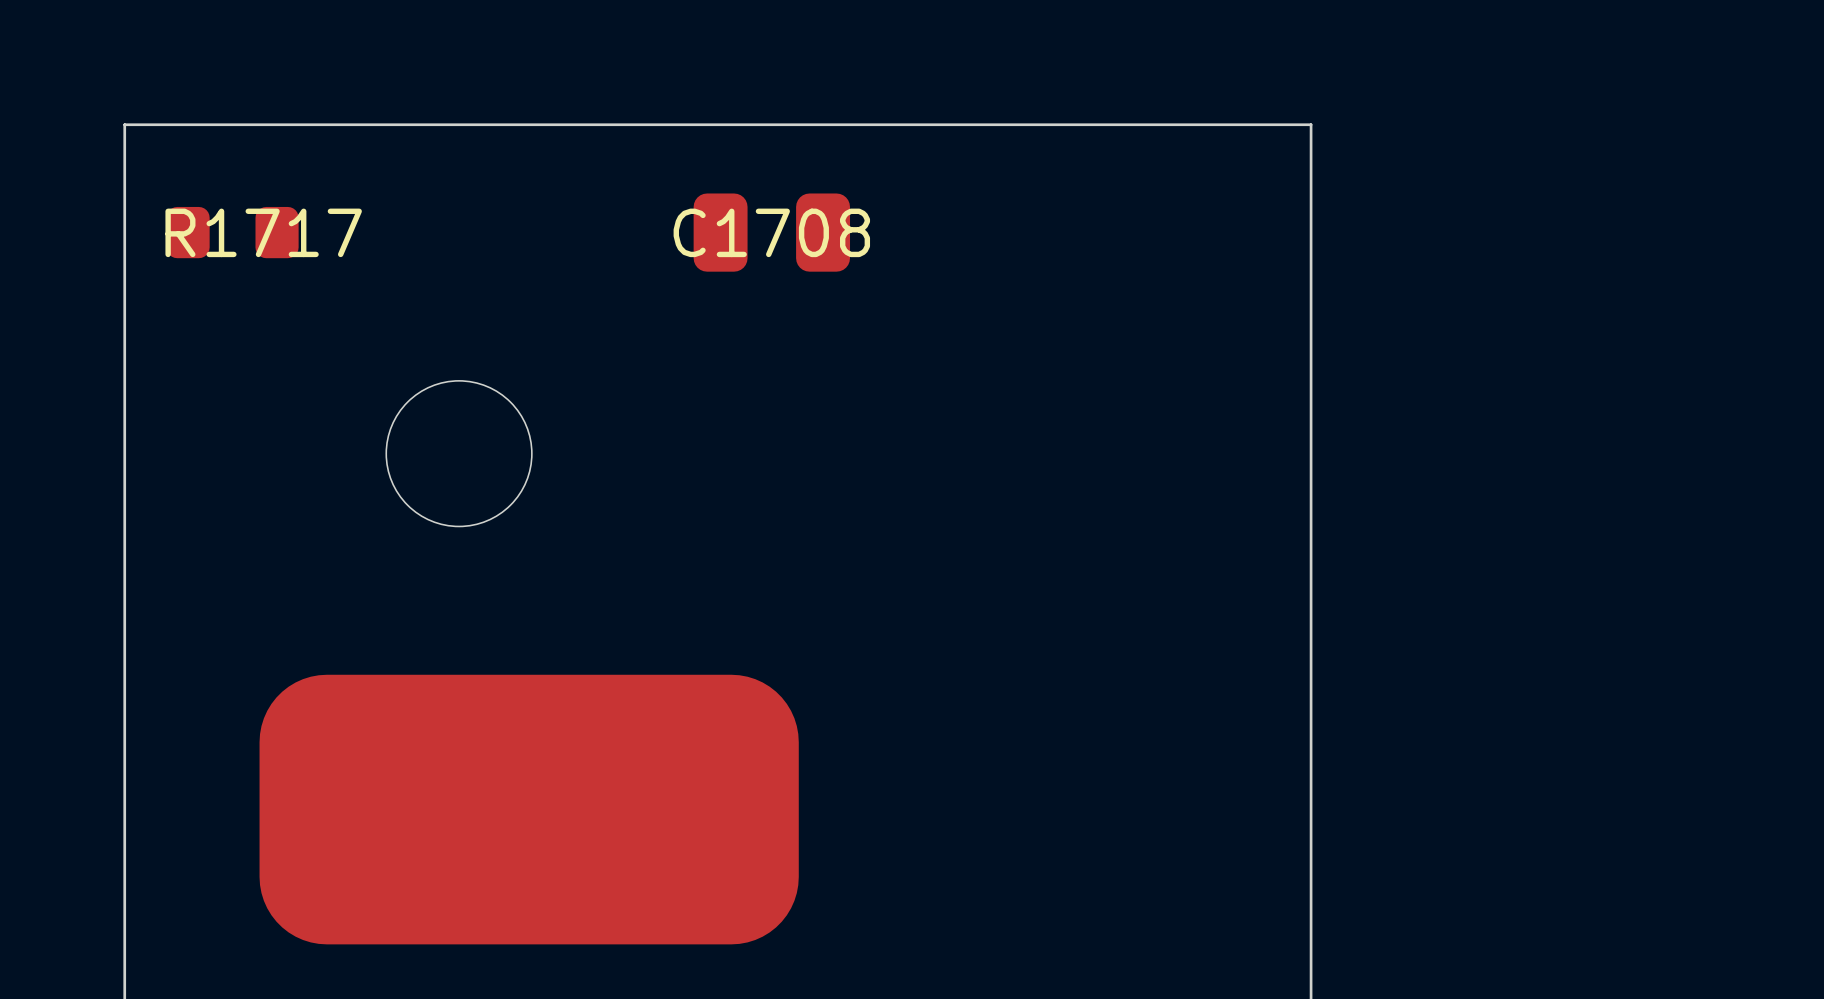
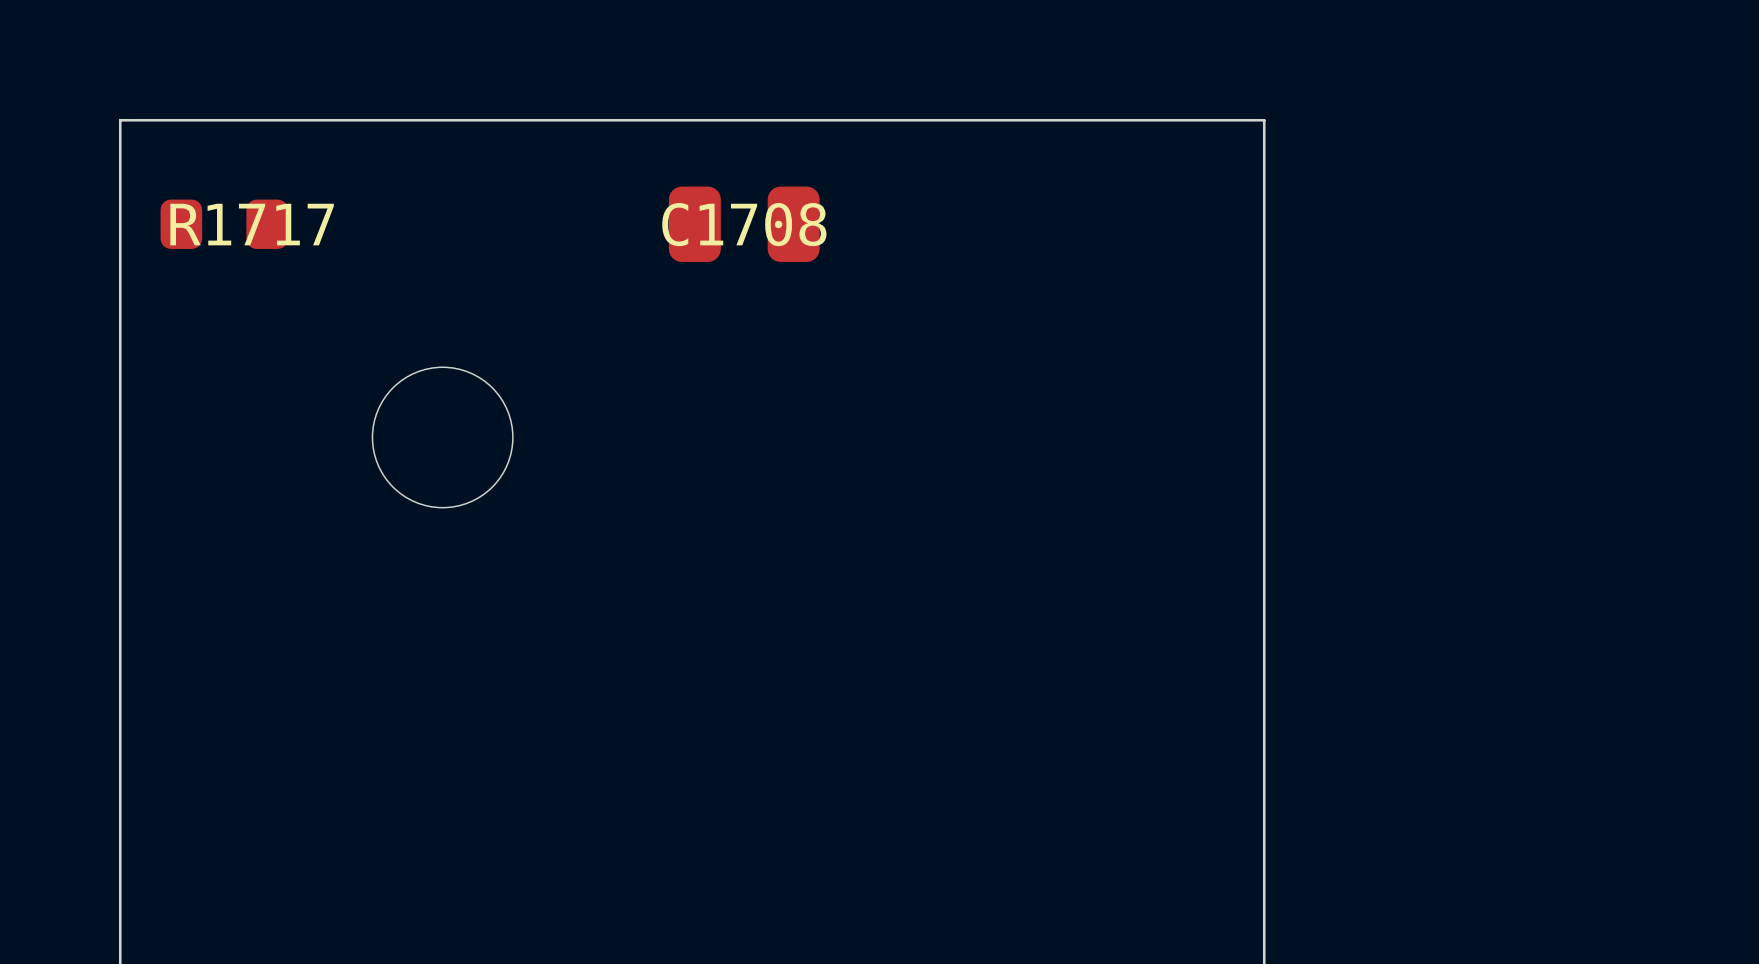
part: (529, 809) -> none

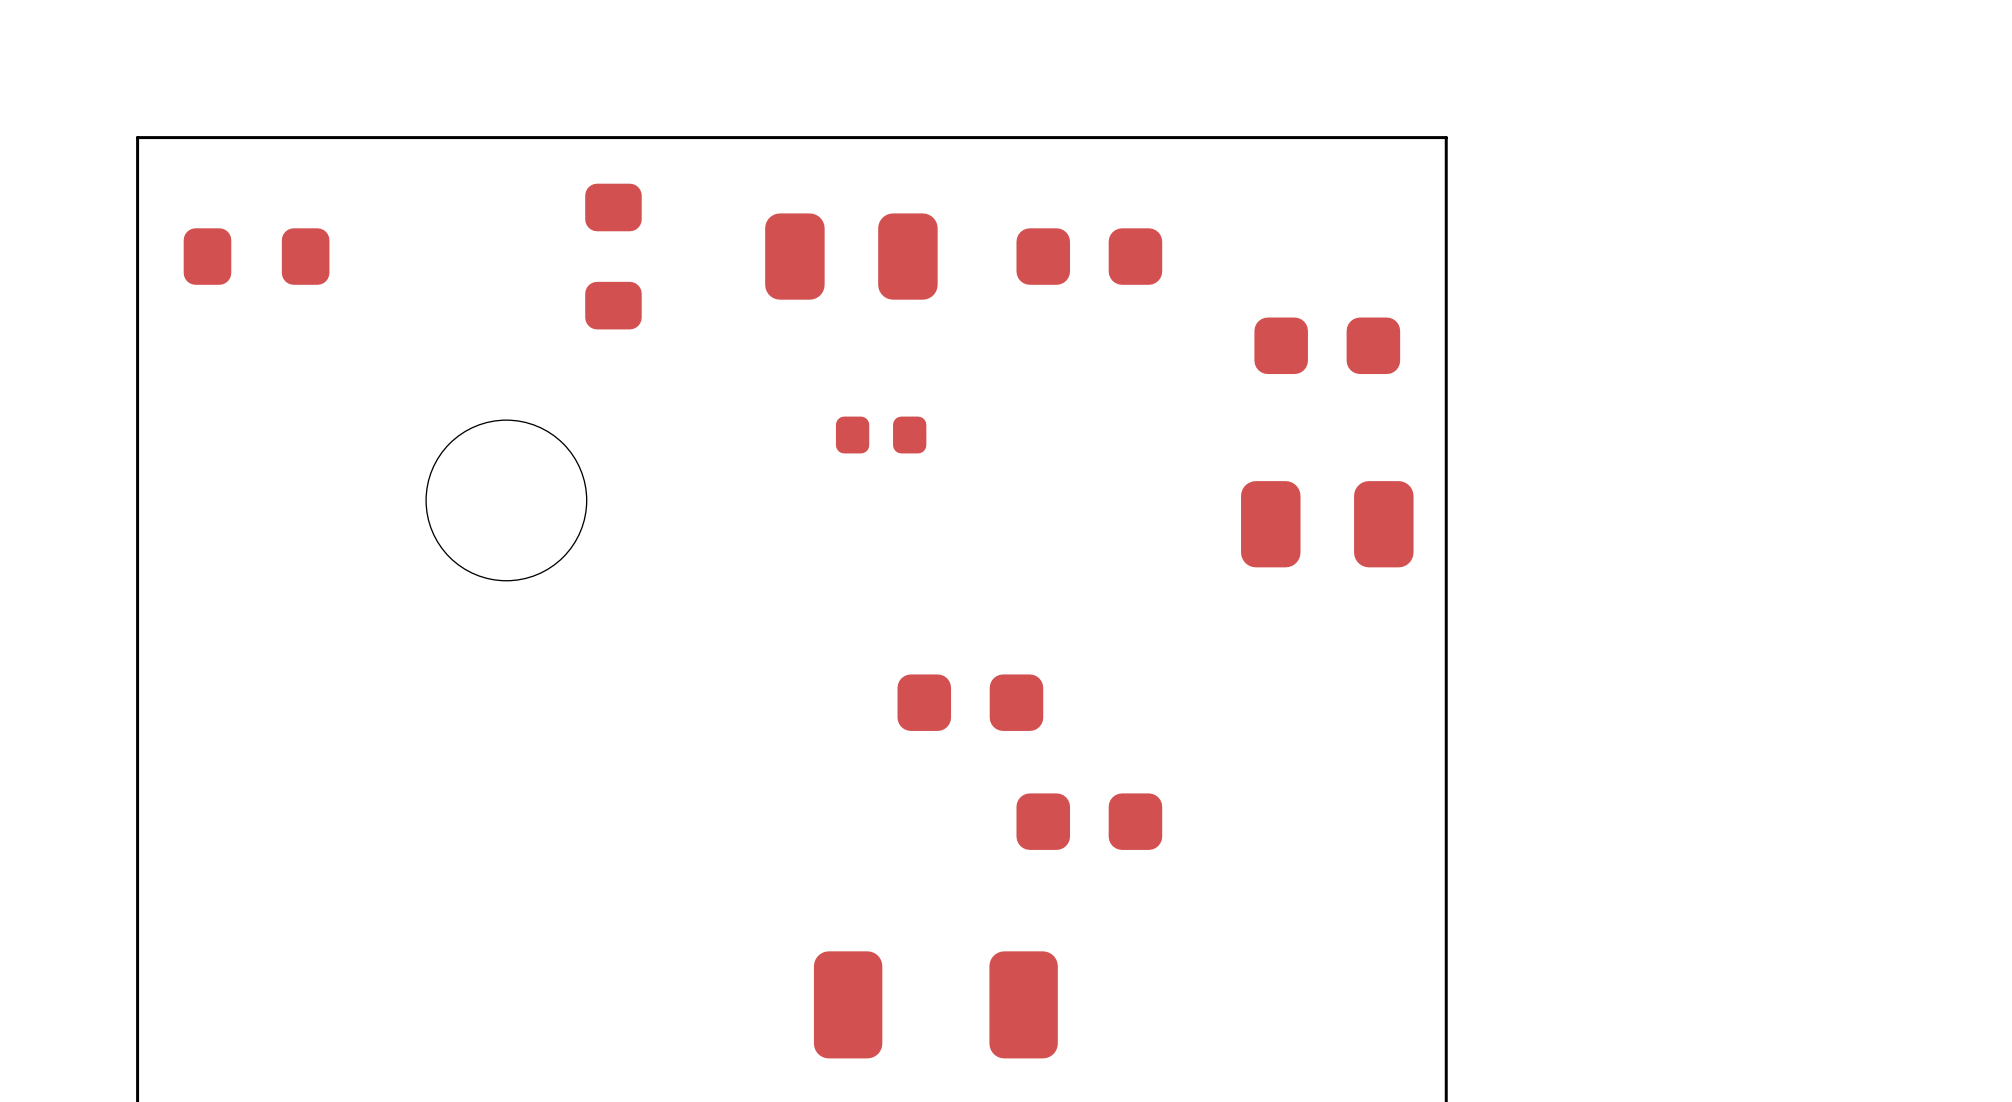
R1717 name: R1717 (252, 224) -> none
part: none -> (613, 256)
C1708 name: C1708 (744, 224) -> none
part: none -> (1089, 256)
part: none -> (1327, 345)
part: none -> (881, 435)
part: none -> (1327, 524)
part: none -> (970, 702)
part: none -> (1089, 821)
part: none -> (935, 1004)

